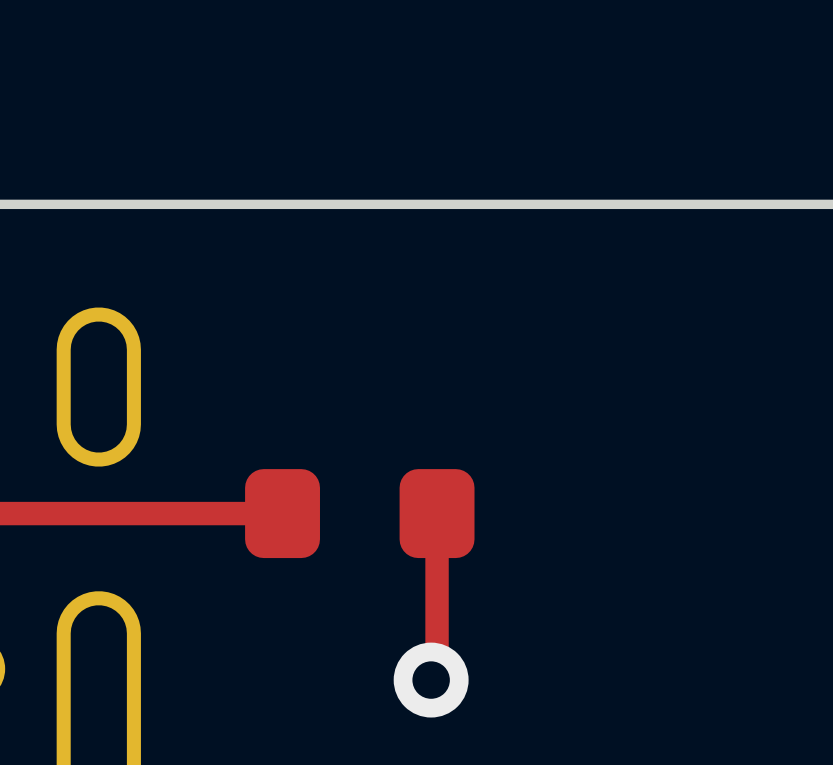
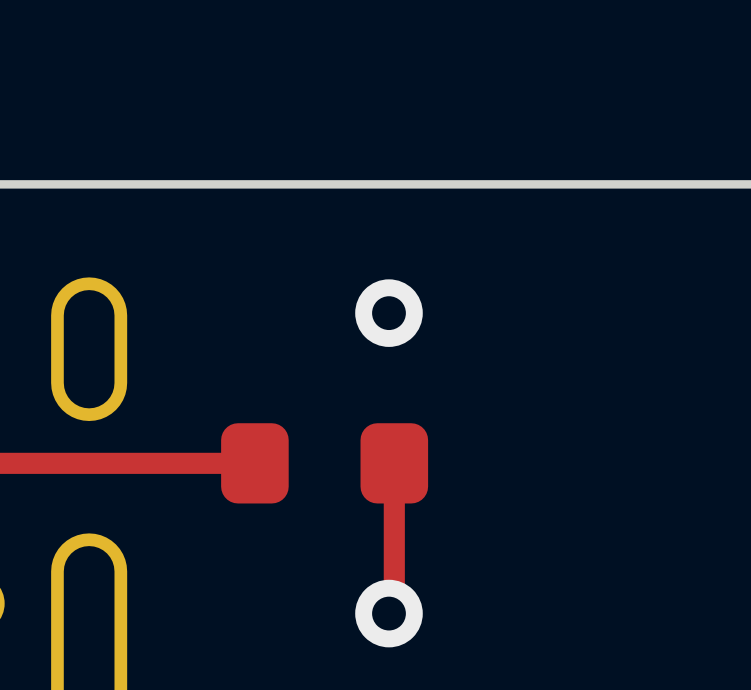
via: none -> (388, 313)

